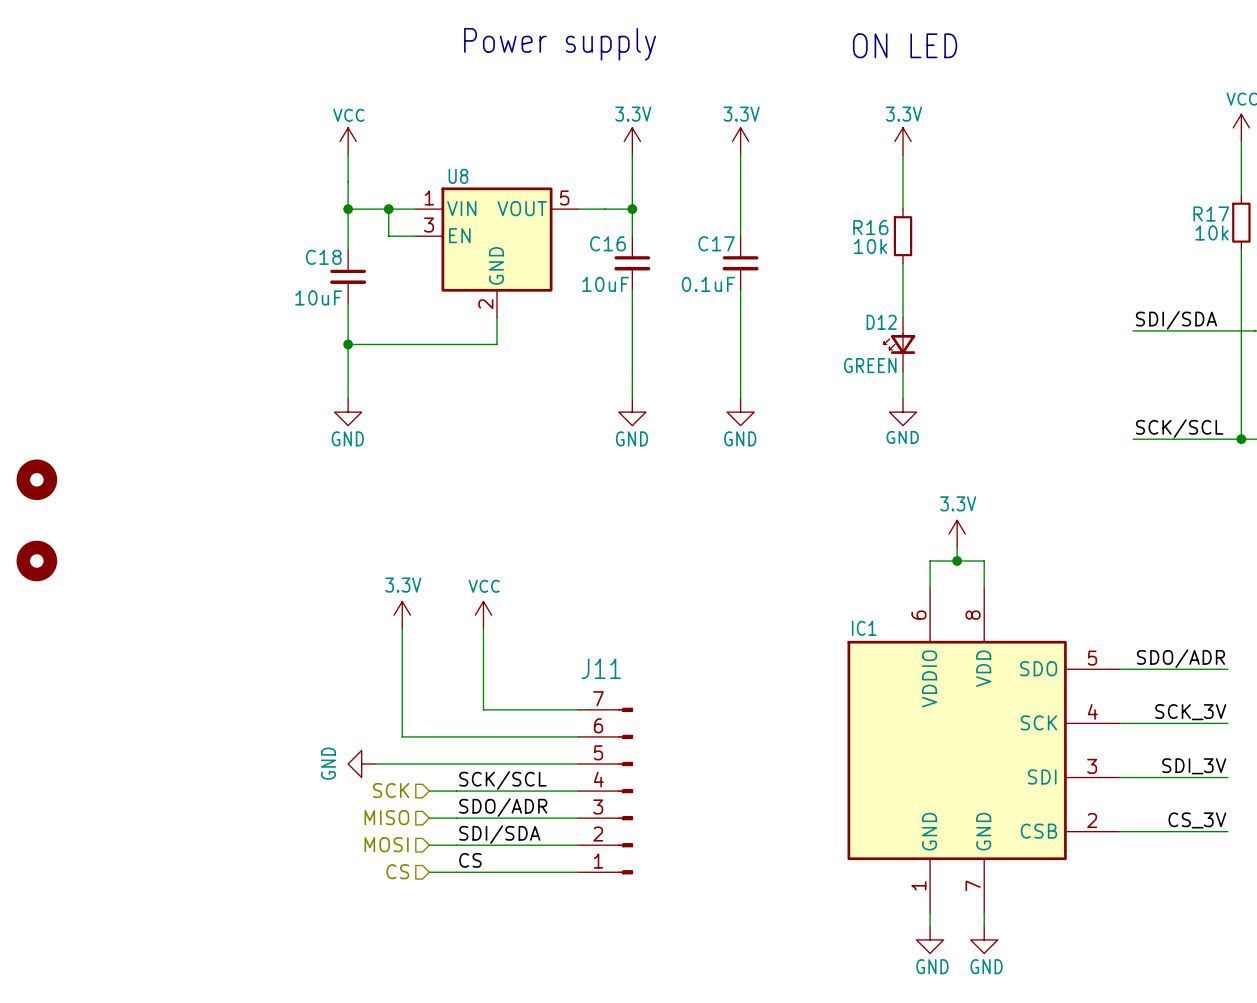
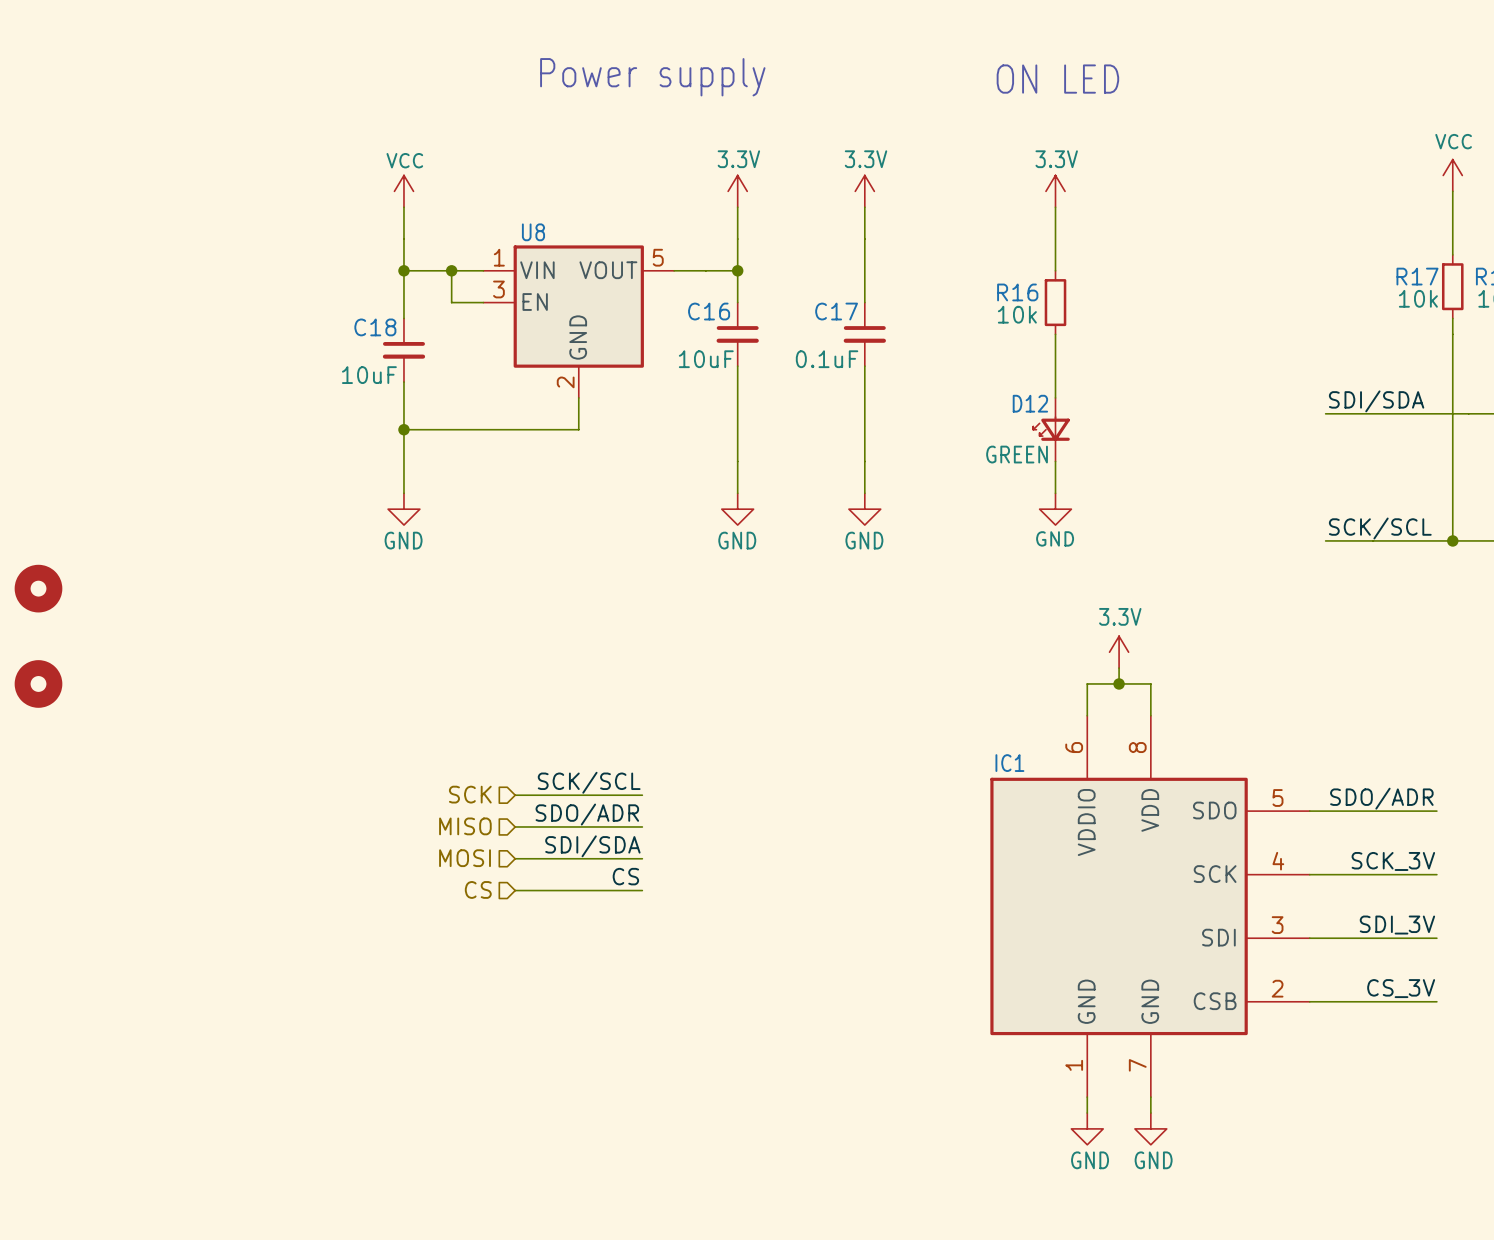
power symbol: 3.3V (402, 615) -> none
power symbol: VCC (483, 615) -> none
wire: (402, 628) (402, 736) (442, 736) -> none
wire: (483, 628) (483, 709) -> (515, 858) (562, 858)
wire: none -> (515, 795) (642, 795)
wire: none -> (515, 826) (642, 826)
wire: (551, 709) (578, 709) -> none
wire: (551, 736) (578, 736) -> none
power symbol: GND (361, 764) -> none
wire: (375, 764) (578, 764) -> none
label position: SCK/SCL (502, 780) -> SCK/SCL (589, 782)
hierarchical label position: SCK (391, 790) -> SCK (470, 794)
wire: (429, 791) (578, 791) -> none
J11: (605, 791) -> none
label position: SDO/ADR (503, 807) -> SDO/ADR (587, 814)
hierarchical label position: MISO (386, 817) -> MISO (465, 826)
wire: (429, 818) (578, 818) -> none
label position: SDI/SDA (499, 834) -> SDI/SDA (592, 846)
hierarchical label position: MOSI (386, 844) -> MOSI (465, 858)
wire: (429, 845) (578, 845) -> none
label position: CS (470, 860) -> CS (625, 876)
hierarchical label position: CS (397, 871) -> CS (478, 889)
wire: (429, 872) (578, 872) -> none

